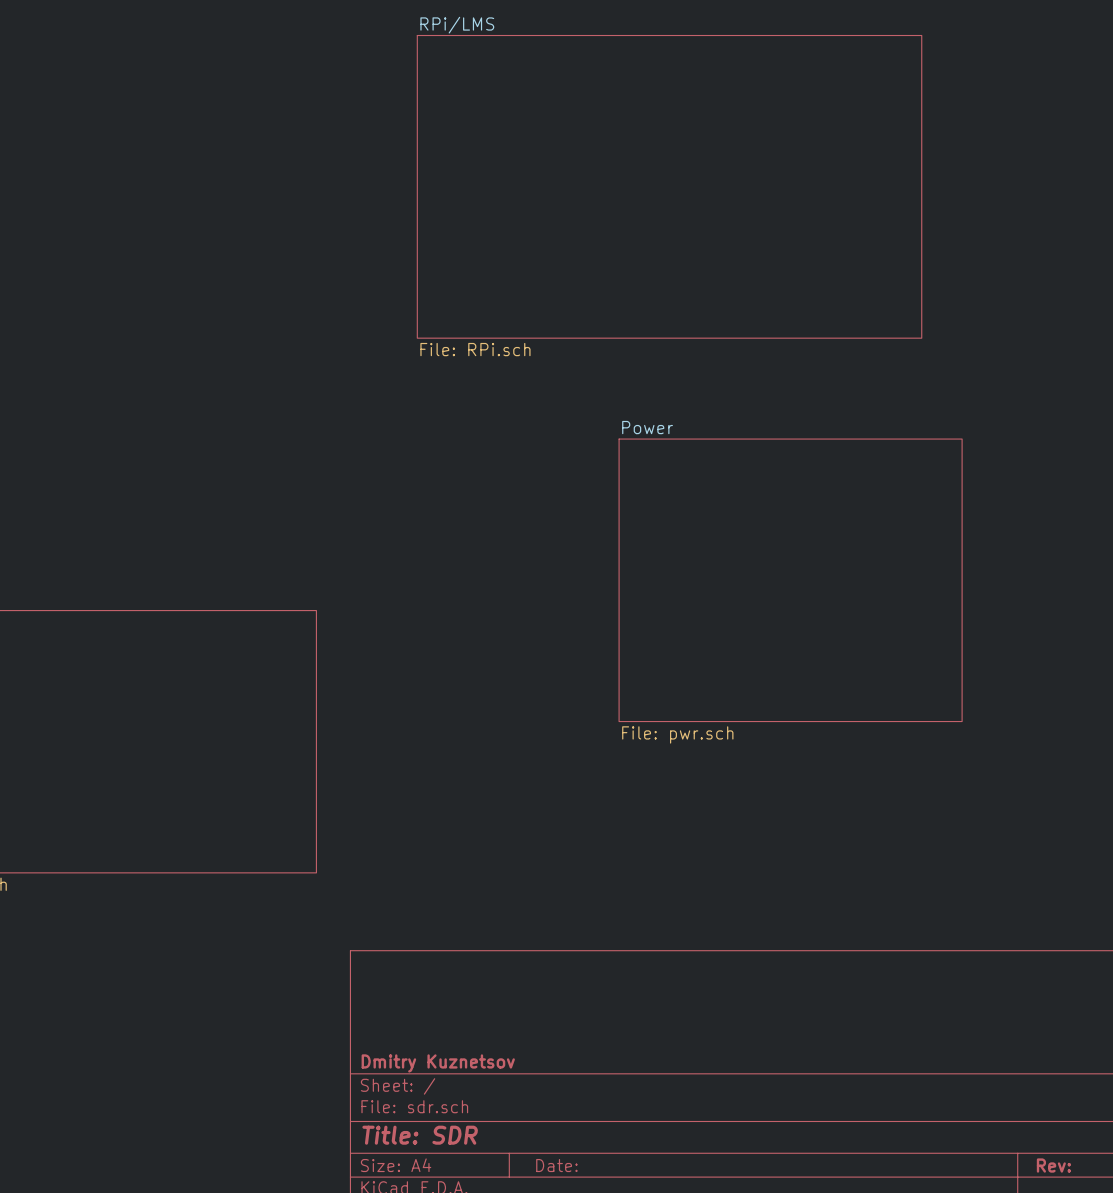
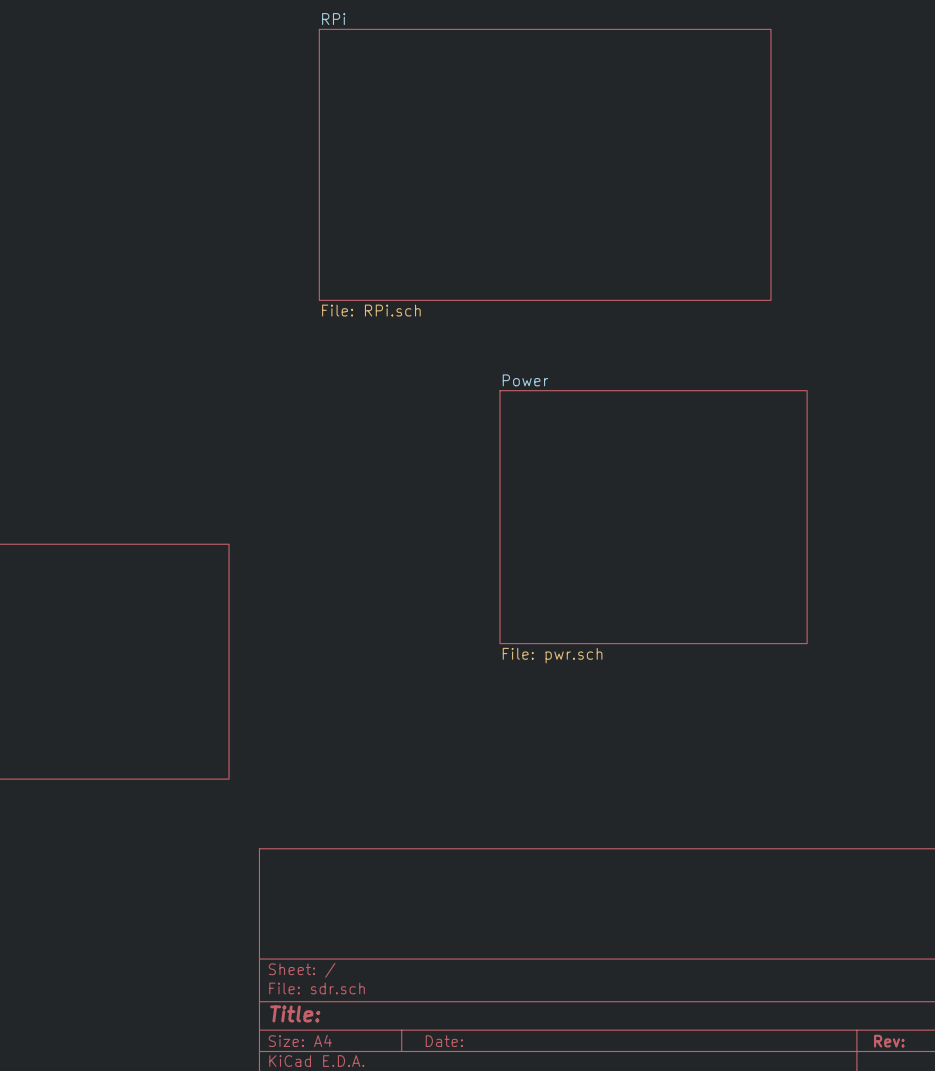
sheet RPi/LMS name: RPi/LMS (457, 25) -> RPi (333, 19)
title block: Dmitry Kuznetsov (438, 1063) -> none
title block: Title: SDR (420, 1135) -> Title: (295, 1013)

